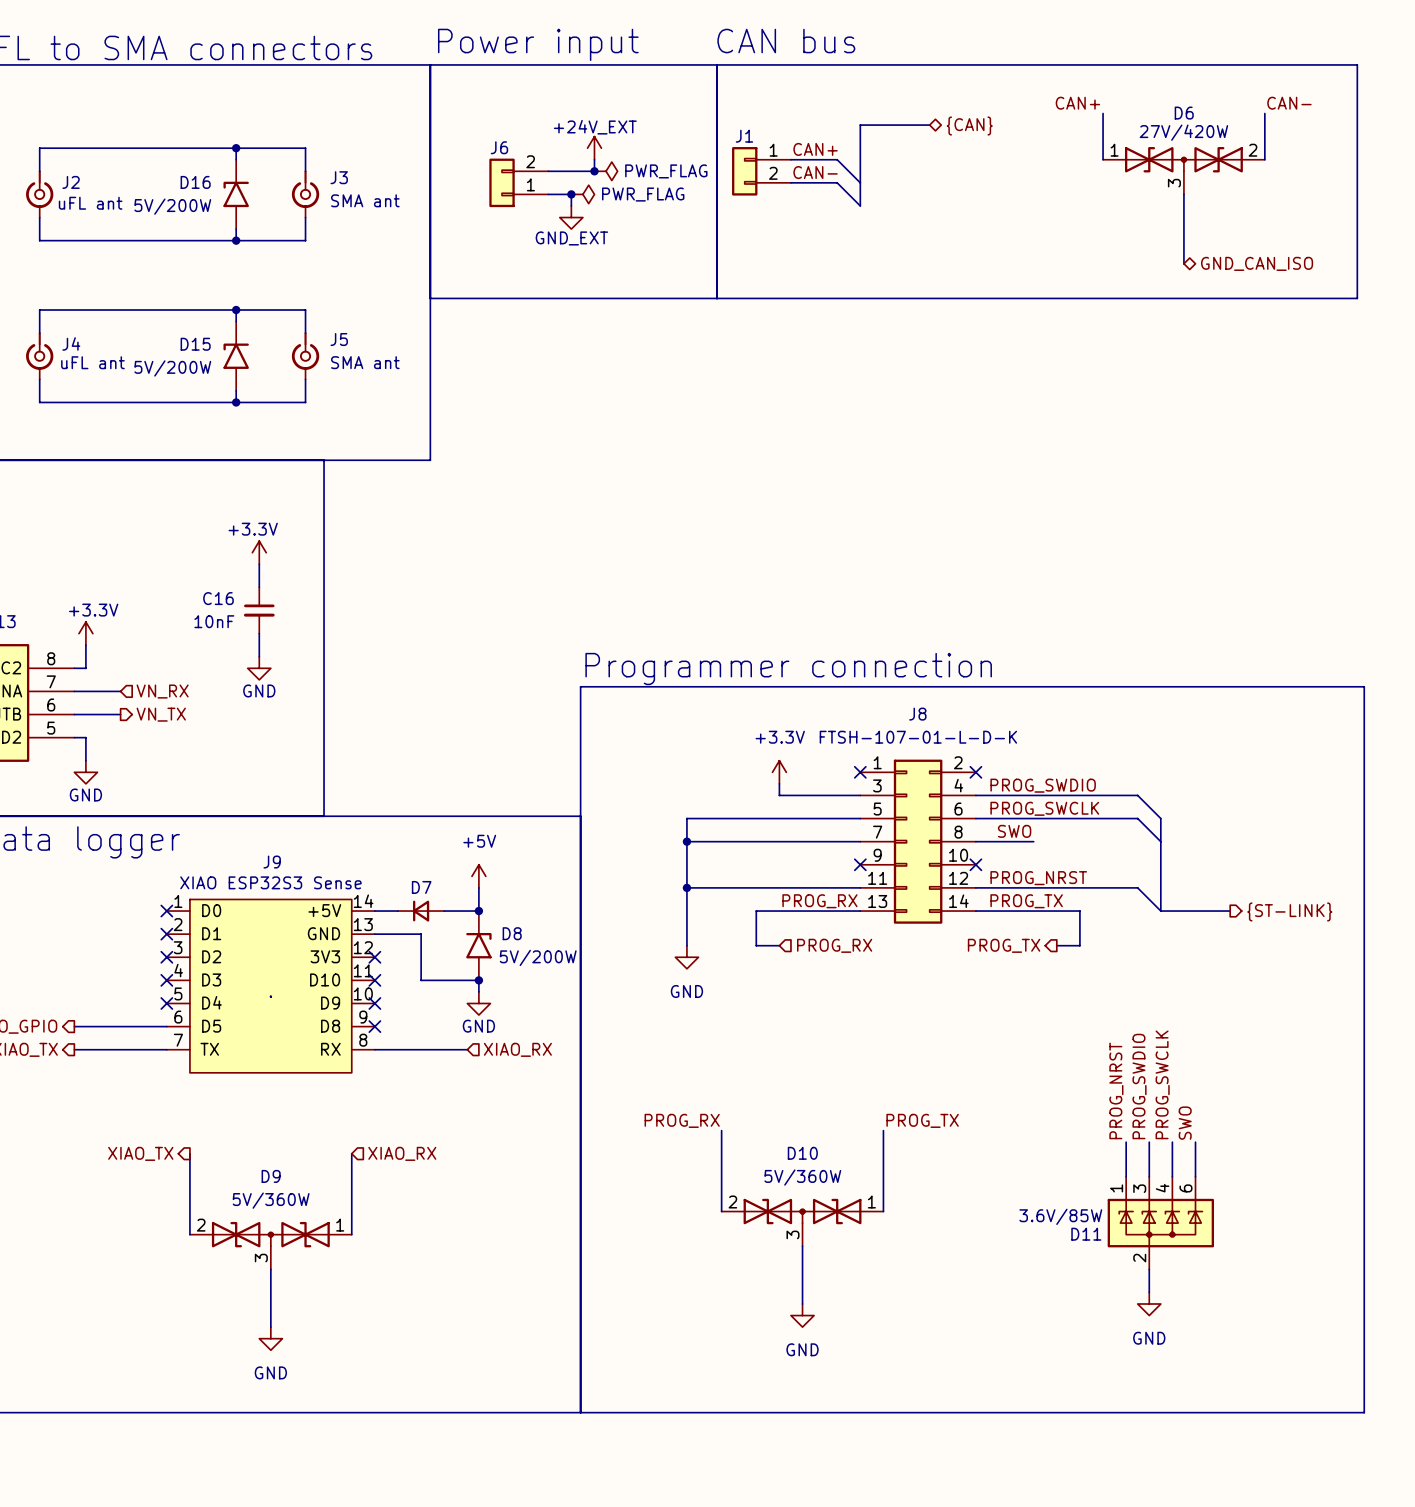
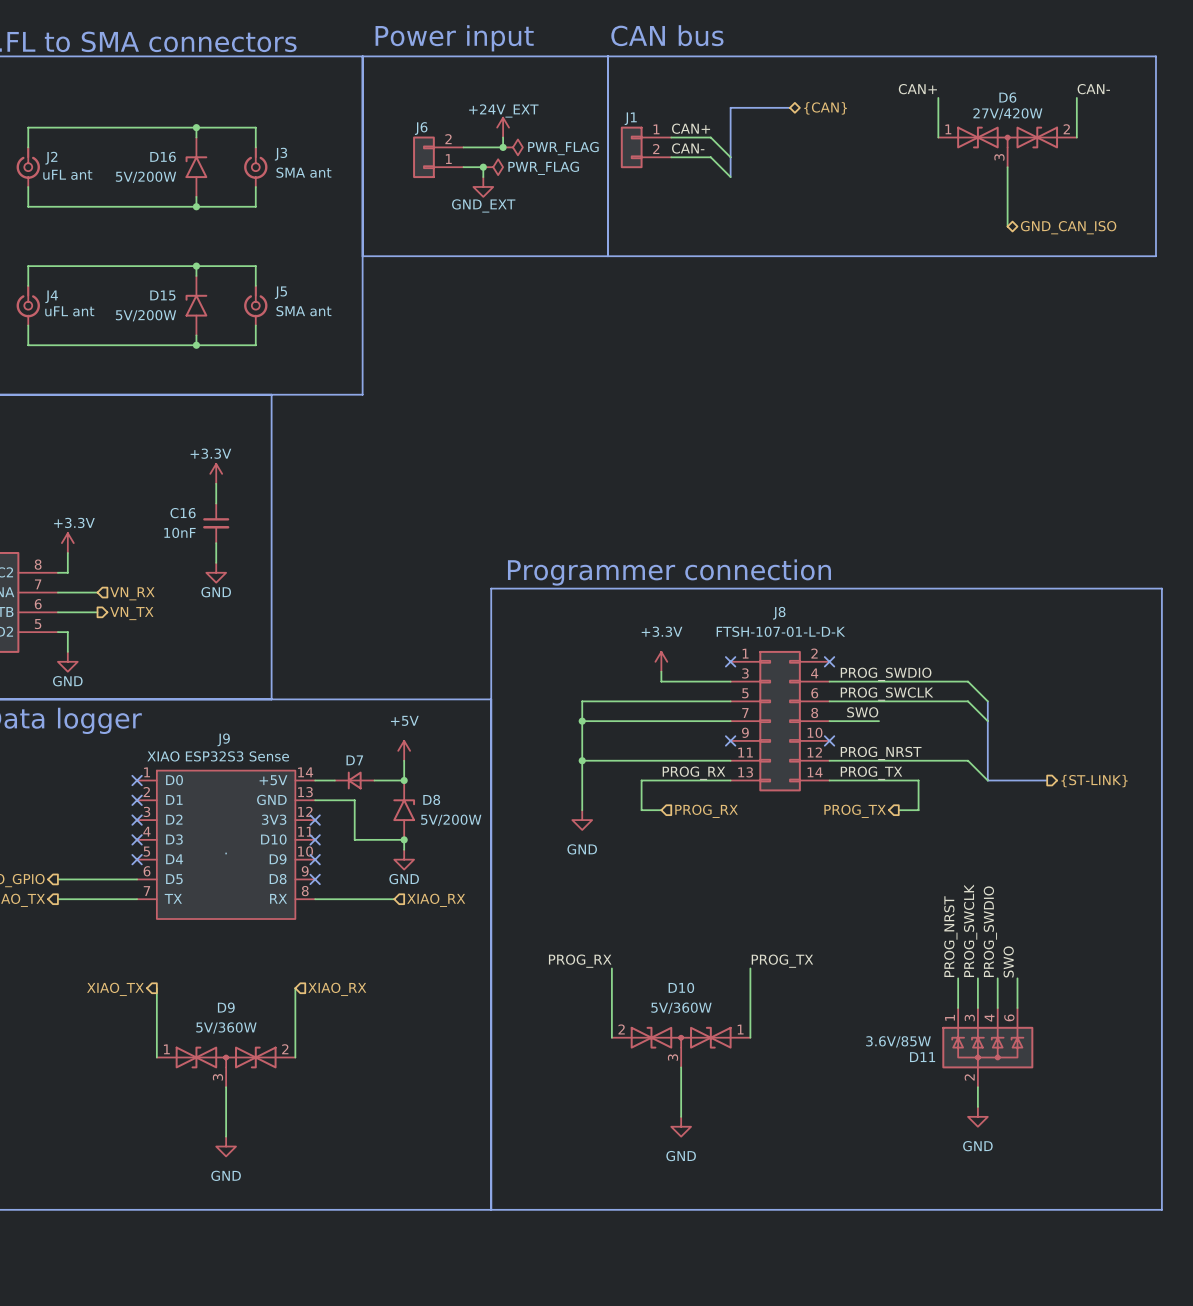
label: PROG_SWCLK (1162, 1084) -> PROG_SWDIO (990, 931)
label: PROG_SWDIO (1139, 1086) -> PROG_SWCLK (970, 930)
D9 flip: as is (270, 1234) -> left-right (226, 1057)

